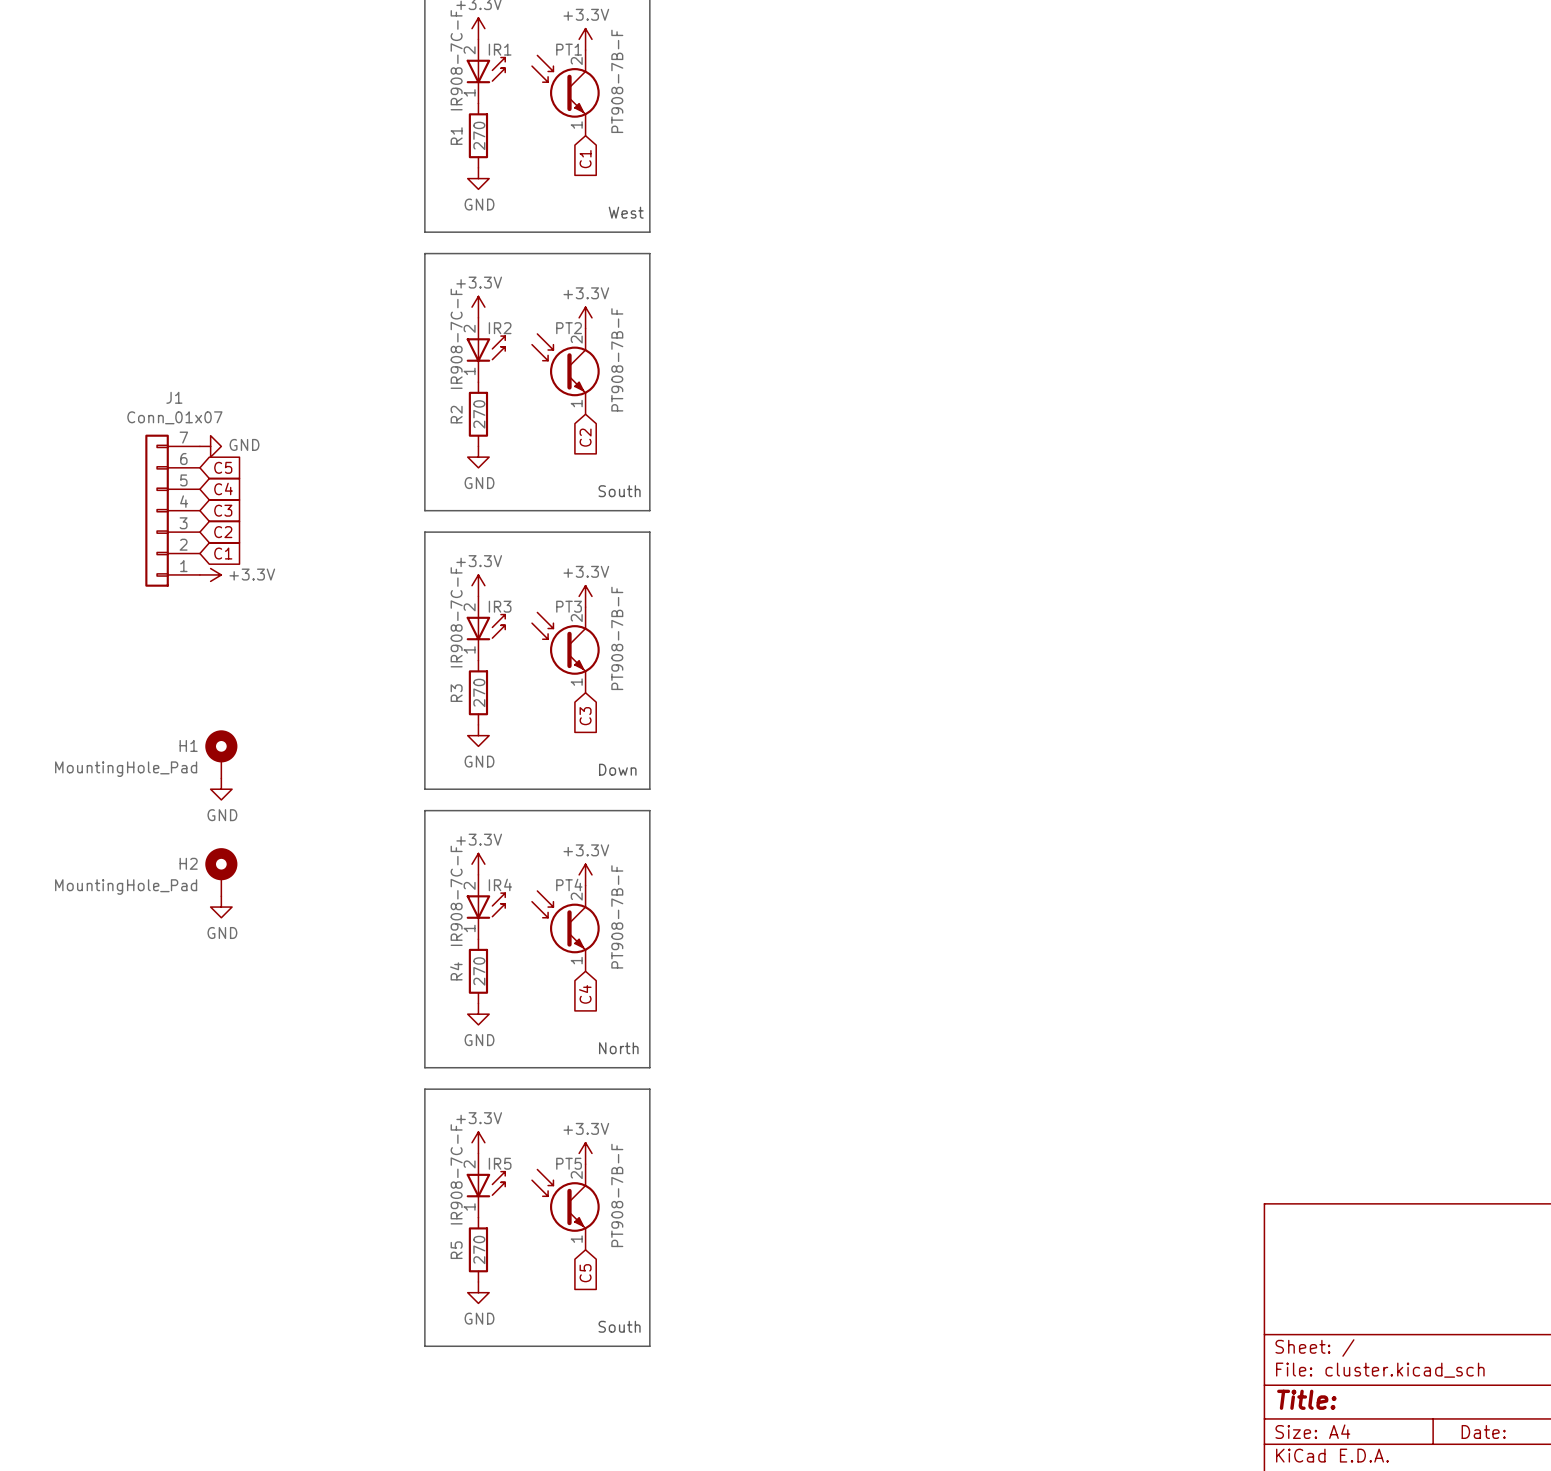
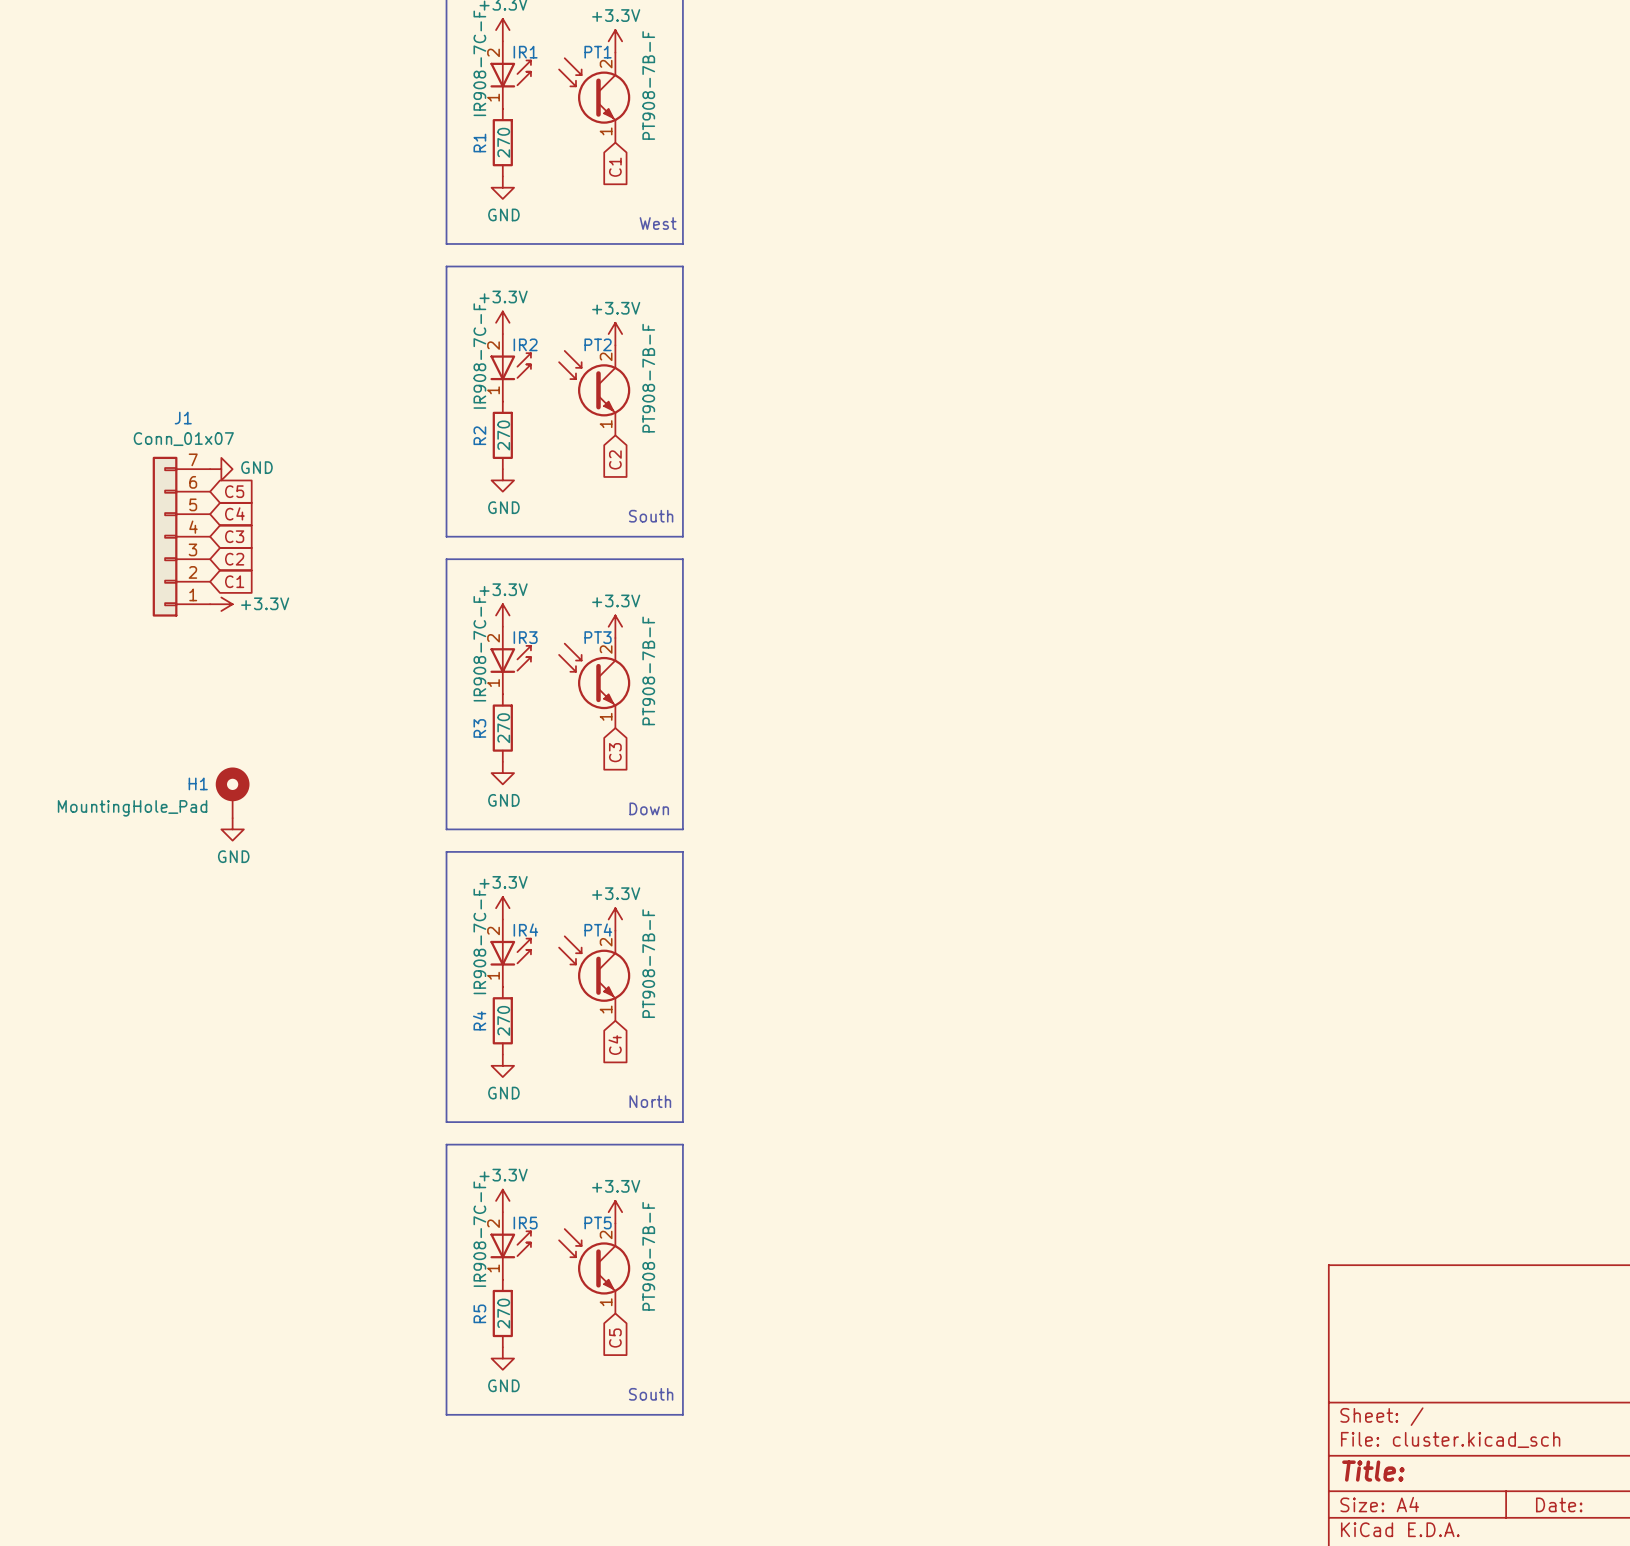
H2: MountingHole_Pad (221, 872) -> none
power symbol: GND (221, 907) -> none

